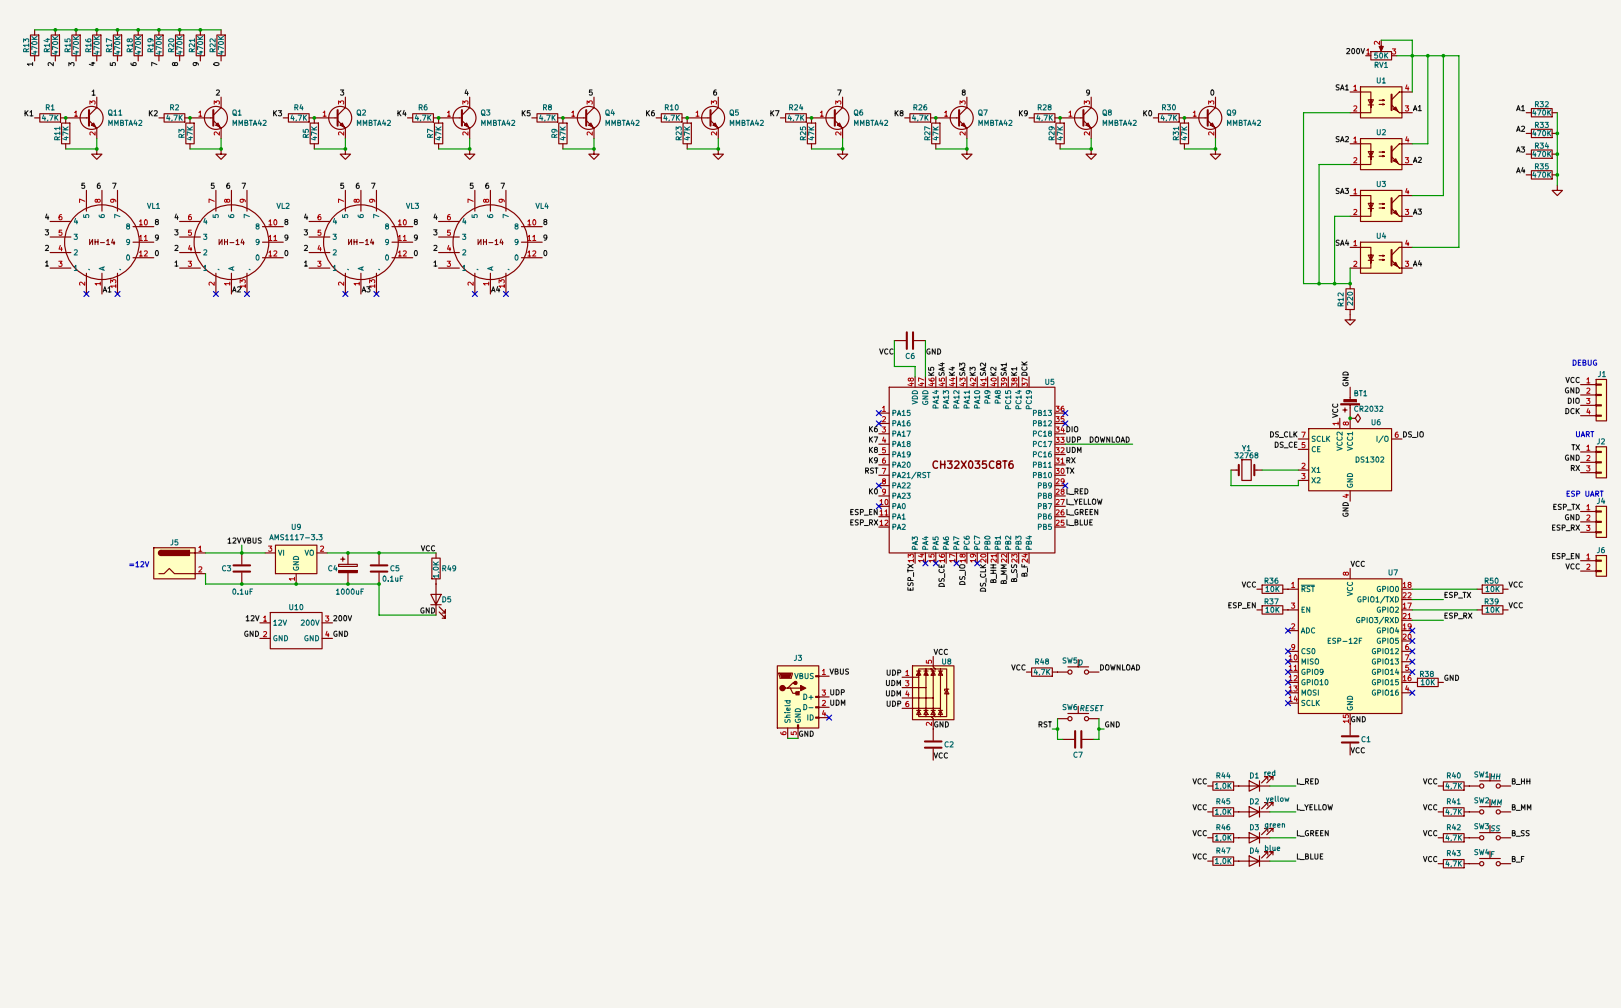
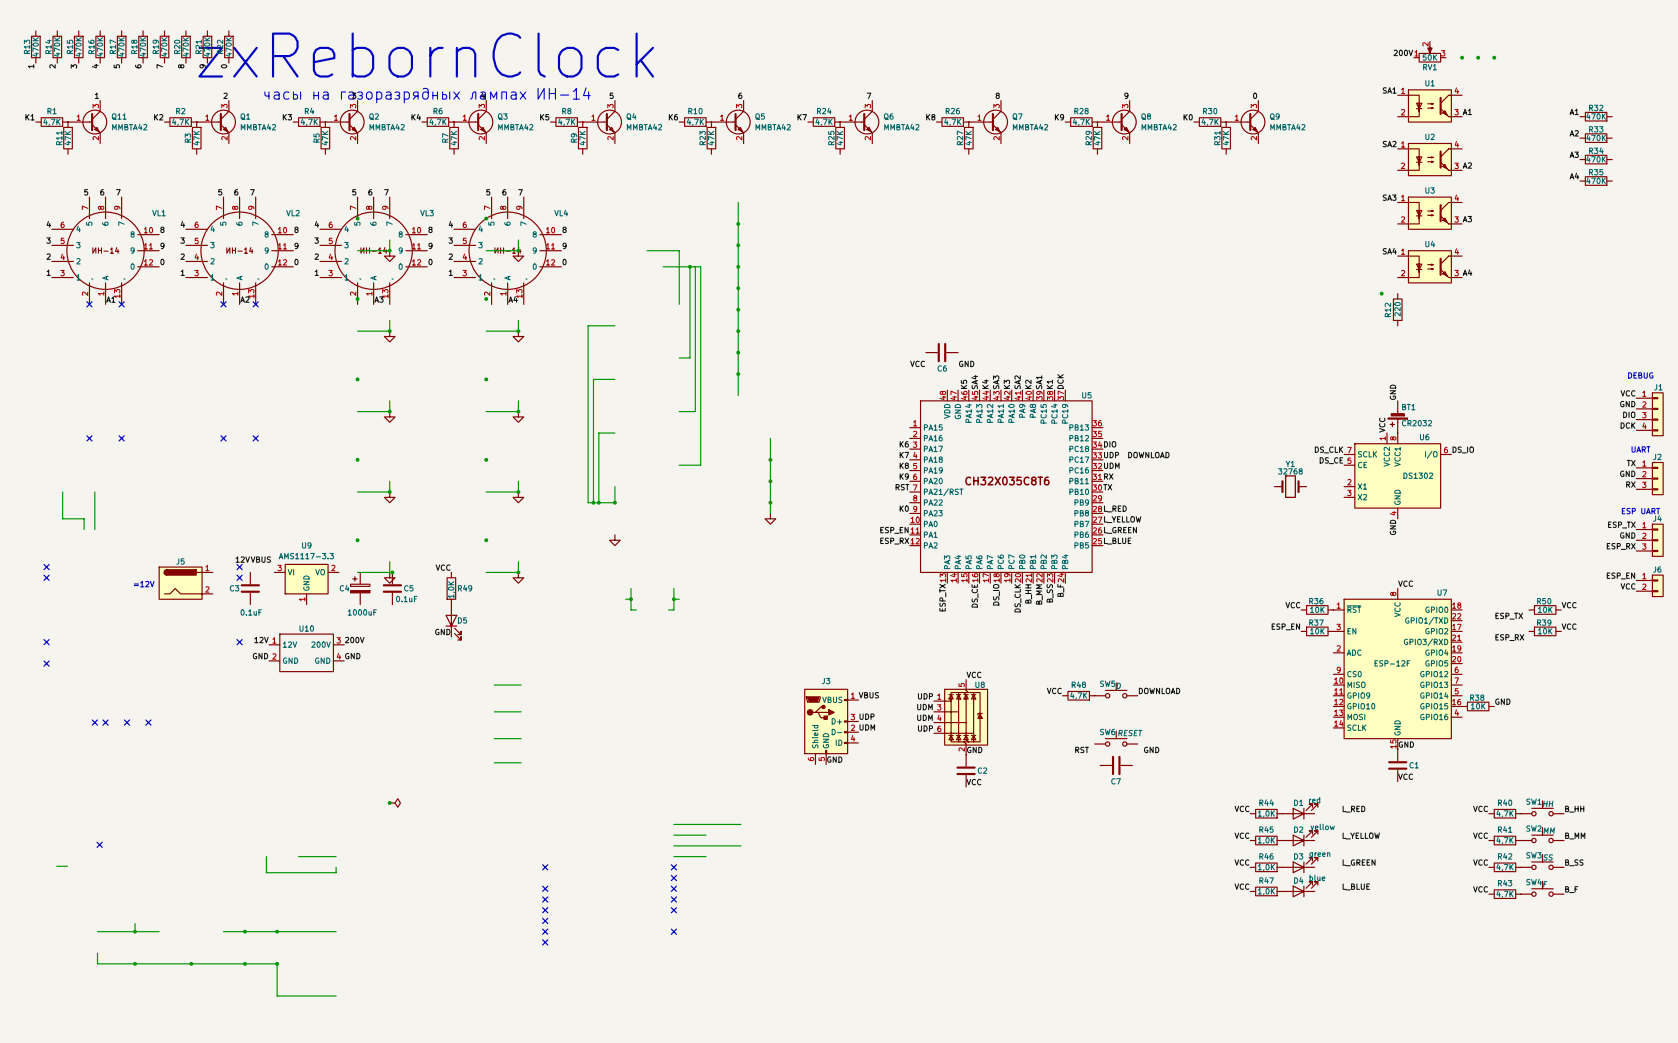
wire: (34, 29) (221, 29) -> none
junction: (55, 29) -> none
junction: (76, 29) -> none
junction: (96, 29) -> none
junction: (117, 29) -> none
junction: (138, 29) -> none
junction: (158, 29) -> none
junction: (179, 29) -> none
junction: (200, 29) -> none
wire: (1381, 40) (1412, 40) (1412, 91) -> none
text: none -> zxRebornClock (426, 55)
wire: (1396, 55) (1458, 55) (1458, 247) (1412, 247) -> none
wire: (1427, 55) (1427, 143) (1412, 143) -> none
wire: (1443, 55) (1443, 195) (1412, 195) -> none
text: none -> часы на газоразрядных лампах ИН-14 (427, 95)
wire: (1350, 112) (1303, 112) (1303, 283) (1350, 283) (1350, 268) -> none
wire: (1557, 112) (1557, 185) -> none
junction: (65, 117) -> none
junction: (190, 117) -> none
junction: (314, 117) -> none
junction: (438, 117) -> none
junction: (562, 117) -> none
junction: (687, 117) -> none
junction: (811, 117) -> none
junction: (935, 117) -> none
junction: (1060, 117) -> none
junction: (1184, 117) -> none
junction: (1557, 133) -> none
wire: (96, 138) (96, 148) (65, 148) -> none
wire: (221, 138) (221, 148) (190, 148) -> none
wire: (345, 138) (345, 148) (314, 148) -> (389, 240) (389, 250) (357, 250)
wire: (469, 138) (469, 148) (438, 148) -> (518, 240) (518, 250) (486, 250)
wire: (593, 138) (593, 148) (562, 148) -> none
wire: (718, 138) (718, 148) (687, 148) -> none
wire: (842, 138) (842, 148) (811, 148) -> none
wire: (966, 138) (966, 148) (935, 148) -> none
wire: (1091, 138) (1091, 148) (1060, 148) -> none
wire: (1215, 138) (1215, 148) (1184, 148) -> none
junction: (96, 148) -> none
junction: (221, 148) -> none
junction: (345, 148) -> none
junction: (469, 148) -> none
junction: (593, 148) -> none
junction: (718, 148) -> none
junction: (842, 148) -> none
junction: (966, 148) -> none
junction: (1091, 148) -> none
junction: (1215, 148) -> none
power symbol: (96, 154) -> none
power symbol: (221, 154) -> none
power symbol: (345, 154) -> none
power symbol: (469, 154) -> none
power symbol: (593, 154) -> none
power symbol: (718, 154) -> none
power symbol: (842, 154) -> none
power symbol: (966, 154) -> none
power symbol: (1091, 154) -> none
power symbol: (1215, 154) -> none
junction: (1557, 154) -> none
wire: (1350, 164) (1319, 164) (1319, 283) -> none
junction: (1557, 174) -> none
power symbol: (1557, 190) -> none
wire: none -> (738, 202) (738, 395)
junction: none -> (357, 218)
junction: none -> (486, 218)
junction: none -> (738, 223)
wire: (1350, 216) (1334, 216) (1334, 283) -> none
junction: none -> (738, 245)
junction: none -> (389, 250)
junction: none -> (518, 250)
wire: none -> (647, 250) (679, 250) (679, 304)
power symbol: none -> (389, 256)
power symbol: none -> (518, 256)
wire: none -> (663, 266) (700, 266) (700, 465) (679, 465)
wire: none -> (689, 266) (689, 357) (679, 357)
junction: none -> (689, 266)
wire: none -> (695, 266) (695, 411) (679, 411)
junction: none -> (738, 266)
junction: none -> (738, 288)
junction: (1319, 283) -> none
junction: (1350, 283) -> none
junction: none -> (357, 298)
junction: none -> (486, 298)
no-connect mark: (345, 293) -> none
no-connect mark: (376, 293) -> none
no-connect mark: (474, 293) -> none
no-connect mark: (505, 293) -> none
junction: none -> (738, 309)
wire: none -> (389, 320) (389, 331) (357, 331)
wire: none -> (518, 320) (518, 331) (486, 331)
wire: none -> (614, 325) (588, 325) (588, 502) (614, 502) (614, 486)
junction: none -> (389, 331)
junction: none -> (518, 331)
junction: none -> (738, 331)
power symbol: (1350, 319) -> none
power symbol: none -> (389, 336)
power symbol: none -> (518, 336)
junction: none -> (738, 352)
wire: (894, 340) (894, 366) (915, 366) (915, 376) -> none
wire: (925, 340) (925, 376) -> none
junction: none -> (738, 374)
junction: none -> (357, 379)
junction: none -> (486, 379)
wire: none -> (614, 379) (593, 379) (593, 502)
wire: none -> (389, 400) (389, 411) (357, 411)
wire: none -> (518, 400) (518, 411) (486, 411)
junction: none -> (389, 411)
junction: none -> (518, 411)
power symbol: none -> (389, 416)
power symbol: none -> (518, 416)
no-connect mark: (878, 413) -> none
no-connect mark: (1065, 413) -> none
wire: none -> (614, 433) (598, 433) (598, 502)
junction: (1350, 418) -> none
power symbol: (1355, 418) -> none
no-connect mark: none -> (89, 438)
no-connect mark: none -> (121, 438)
no-connect mark: none -> (223, 438)
no-connect mark: none -> (255, 438)
wire: none -> (770, 438) (770, 513)
no-connect mark: (878, 423) -> none
no-connect mark: (1065, 423) -> none
junction: none -> (357, 459)
junction: none -> (486, 459)
junction: none -> (770, 459)
wire: (1065, 444) (1132, 444) -> none
wire: none -> (389, 481) (389, 492) (357, 492)
wire: none -> (518, 481) (518, 492) (486, 492)
junction: none -> (770, 481)
wire: (1231, 470) (1231, 485) (1298, 485) (1298, 480) -> none
wire: (1262, 470) (1298, 470) -> none
wire: none -> (62, 492) (62, 518) (84, 518) (84, 529)
wire: none -> (94, 492) (94, 529)
junction: none -> (389, 492)
junction: none -> (518, 492)
power symbol: none -> (389, 497)
power symbol: none -> (518, 497)
junction: none -> (593, 502)
junction: none -> (598, 502)
junction: none -> (614, 502)
junction: none -> (770, 502)
no-connect mark: (878, 485) -> none
no-connect mark: (1065, 485) -> none
power symbol: none -> (770, 518)
no-connect mark: (878, 506) -> none
junction: none -> (357, 540)
junction: none -> (486, 540)
power symbol: none -> (614, 540)
wire: none -> (518, 561) (518, 572) (486, 572)
wire: (241, 545) (241, 552) -> none
no-connect mark: none -> (46, 567)
no-connect mark: none -> (239, 567)
wire: (205, 552) (265, 552) -> none
junction: (241, 552) -> none
wire: (327, 552) (345, 552) -> none
junction: (347, 552) -> none
wire: (376, 552) (436, 552) -> (389, 572) (389, 561)
junction: none -> (518, 572)
no-connect mark: none -> (46, 577)
no-connect mark: none -> (239, 577)
power symbol: none -> (389, 577)
power symbol: none -> (518, 577)
no-connect mark: (925, 563) -> none
no-connect mark: (935, 563) -> none
no-connect mark: (956, 563) -> none
no-connect mark: (977, 563) -> none
wire: none -> (631, 588) (631, 609) (636, 609)
wire: none -> (673, 588) (673, 609) (668, 609)
wire: (205, 573) (205, 584) (379, 584) (379, 615) (436, 615) -> none
wire: none -> (625, 599) (631, 599)
junction: none -> (631, 599)
wire: none -> (673, 599) (679, 599)
junction: none -> (673, 599)
junction: (241, 584) -> none
junction: (296, 584) -> none
junction: (347, 584) -> none
junction: (379, 584) -> none
wire: (1412, 589) (1477, 589) -> none
wire: (1412, 599) (1443, 599) -> none
wire: (1412, 609) (1477, 609) -> none
no-connect mark: none -> (46, 642)
no-connect mark: none -> (239, 642)
wire: (1412, 620) (1443, 620) -> none
no-connect mark: (1287, 630) -> none
no-connect mark: (1412, 630) -> none
no-connect mark: none -> (46, 663)
no-connect mark: (1412, 640) -> none
no-connect mark: (1287, 651) -> none
no-connect mark: (1412, 651) -> none
wire: none -> (494, 685) (521, 685)
no-connect mark: (1287, 661) -> none
no-connect mark: (1412, 661) -> none
no-connect mark: (1287, 672) -> none
no-connect mark: (1412, 672) -> none
no-connect mark: (1287, 682) -> none
wire: none -> (494, 711) (521, 711)
no-connect mark: (1287, 692) -> none
no-connect mark: (1412, 692) -> none
no-connect mark: none -> (94, 722)
no-connect mark: none -> (105, 722)
no-connect mark: none -> (126, 722)
no-connect mark: none -> (148, 722)
no-connect mark: (1287, 703) -> none
wire: none -> (494, 738) (521, 738)
no-connect mark: (829, 717) -> none
wire: (1057, 718) (1057, 739) (1062, 739) -> none
wire: (1098, 718) (1098, 739) (1093, 739) -> none
wire: (1052, 729) (1057, 729) -> none
junction: (1057, 729) -> none
wire: (1098, 729) (1104, 729) -> none
junction: (1098, 729) -> none
wire: none -> (494, 762) (521, 762)
wire: (787, 738) (798, 738) -> none
junction: none -> (389, 802)
power symbol: none -> (395, 802)
wire: (1269, 786) (1295, 786) -> none
wire: none -> (673, 824) (740, 824)
wire: none -> (673, 835) (706, 835)
wire: (1269, 811) (1295, 811) -> none
no-connect mark: none -> (99, 844)
wire: none -> (673, 845) (740, 845)
wire: none -> (266, 856) (266, 872) (336, 872) (336, 867)
wire: none -> (298, 856) (336, 856)
wire: none -> (673, 856) (706, 856)
wire: none -> (56, 866) (67, 866)
no-connect mark: none -> (545, 867)
no-connect mark: none -> (673, 867)
wire: (1269, 837) (1295, 837) -> none
no-connect mark: none -> (673, 878)
no-connect mark: none -> (545, 888)
no-connect mark: none -> (673, 888)
wire: (1269, 861) (1295, 861) -> none
no-connect mark: none -> (545, 899)
no-connect mark: none -> (673, 899)
no-connect mark: none -> (545, 910)
no-connect mark: none -> (673, 910)
no-connect mark: none -> (545, 920)
wire: none -> (135, 923) (135, 931)
wire: none -> (97, 931) (159, 931)
junction: none -> (135, 931)
wire: none -> (223, 931) (336, 931)
junction: none -> (244, 931)
junction: none -> (277, 931)
no-connect mark: none -> (545, 931)
no-connect mark: none -> (673, 931)
no-connect mark: none -> (545, 942)
wire: none -> (97, 953) (97, 963) (277, 963) (277, 996) (336, 996)
junction: none -> (135, 963)
junction: none -> (191, 963)
junction: none -> (244, 963)
junction: none -> (277, 963)

